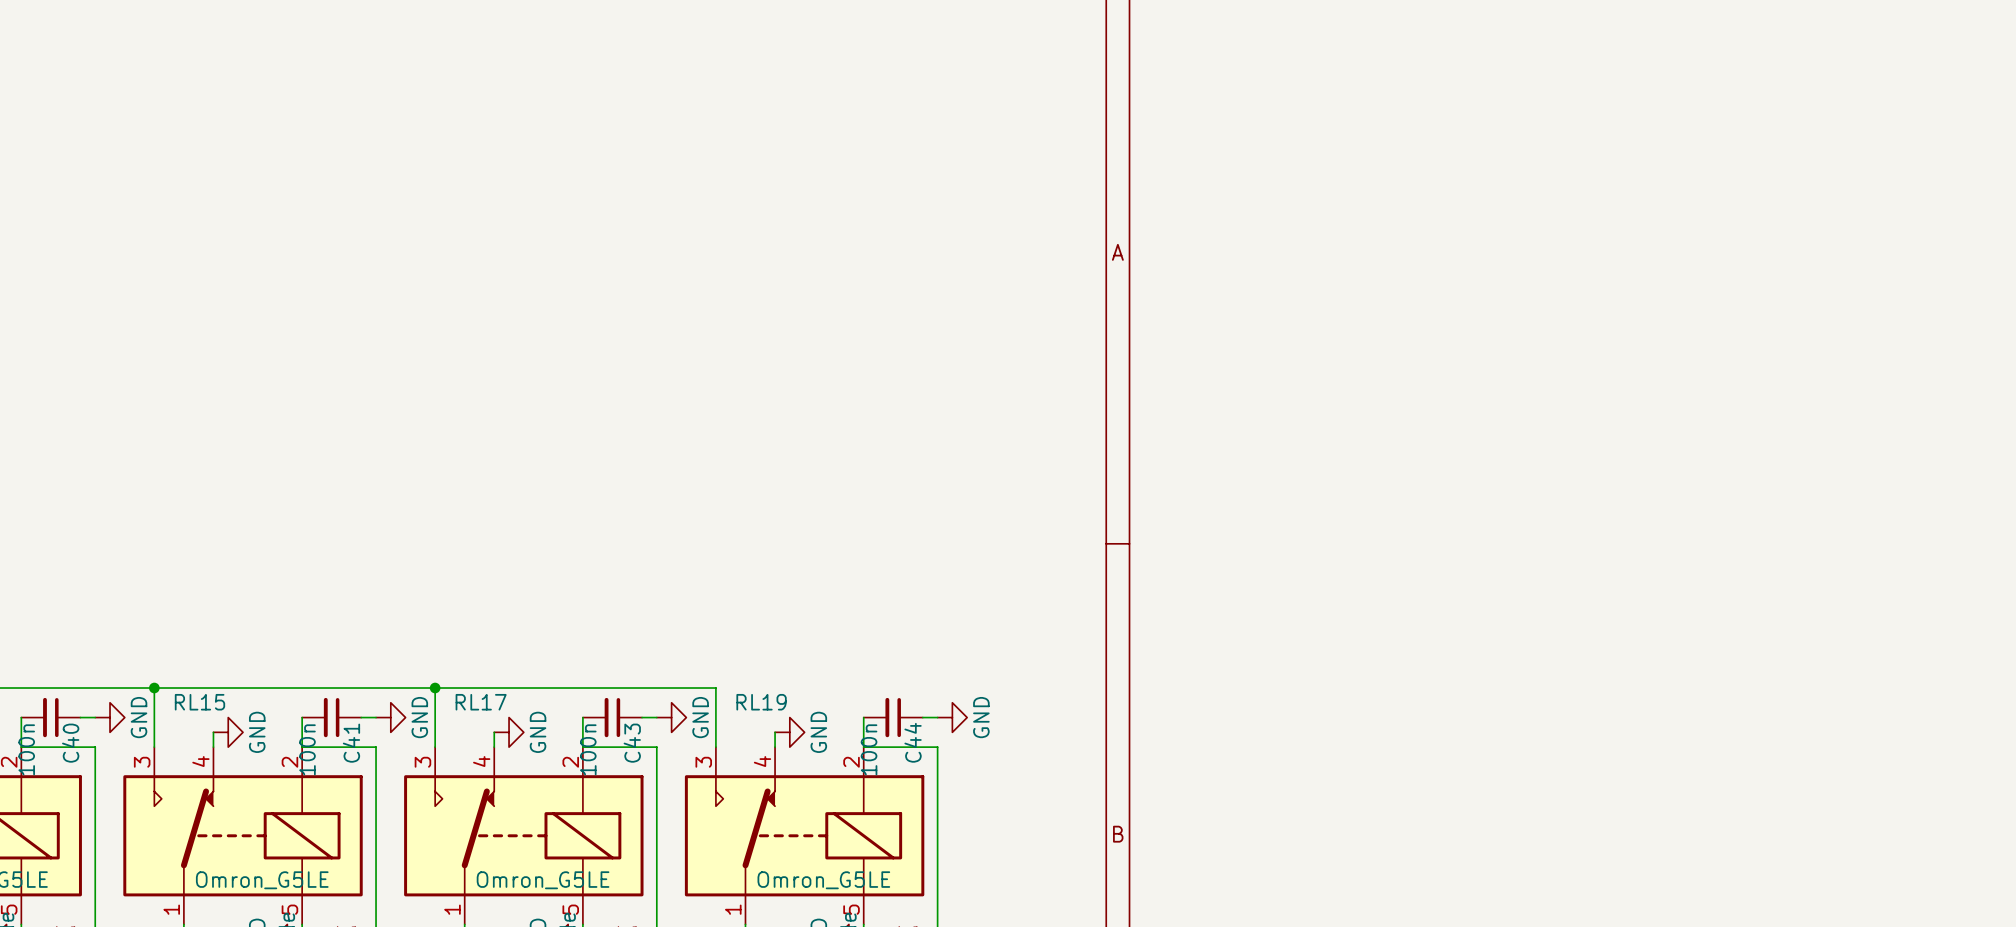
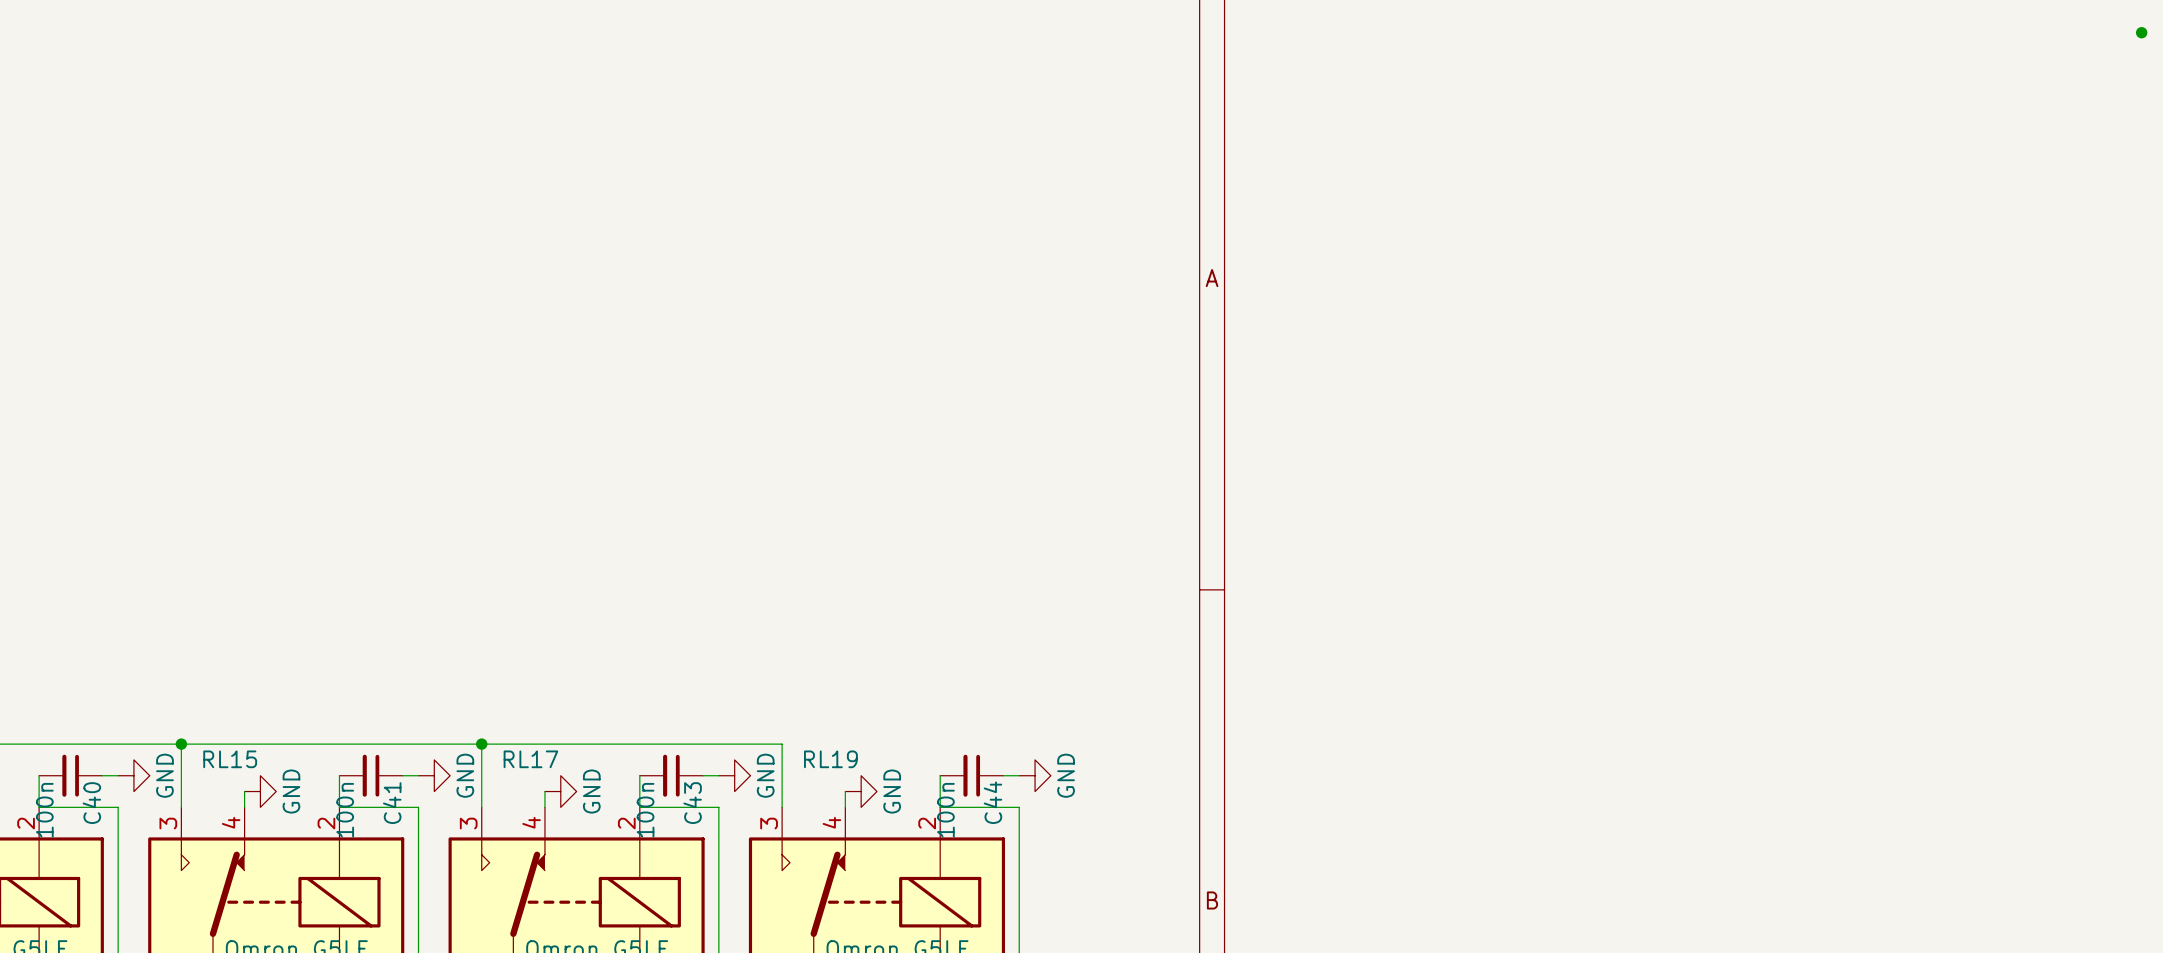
junction: none -> (2141, 32)

